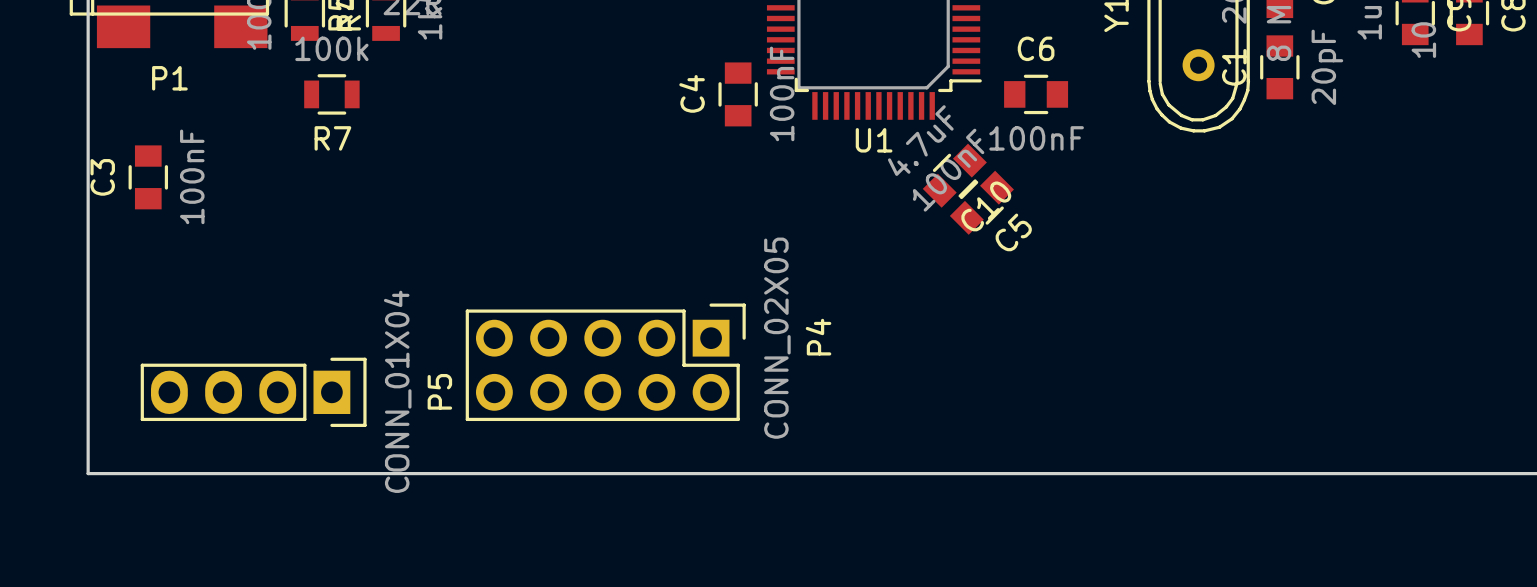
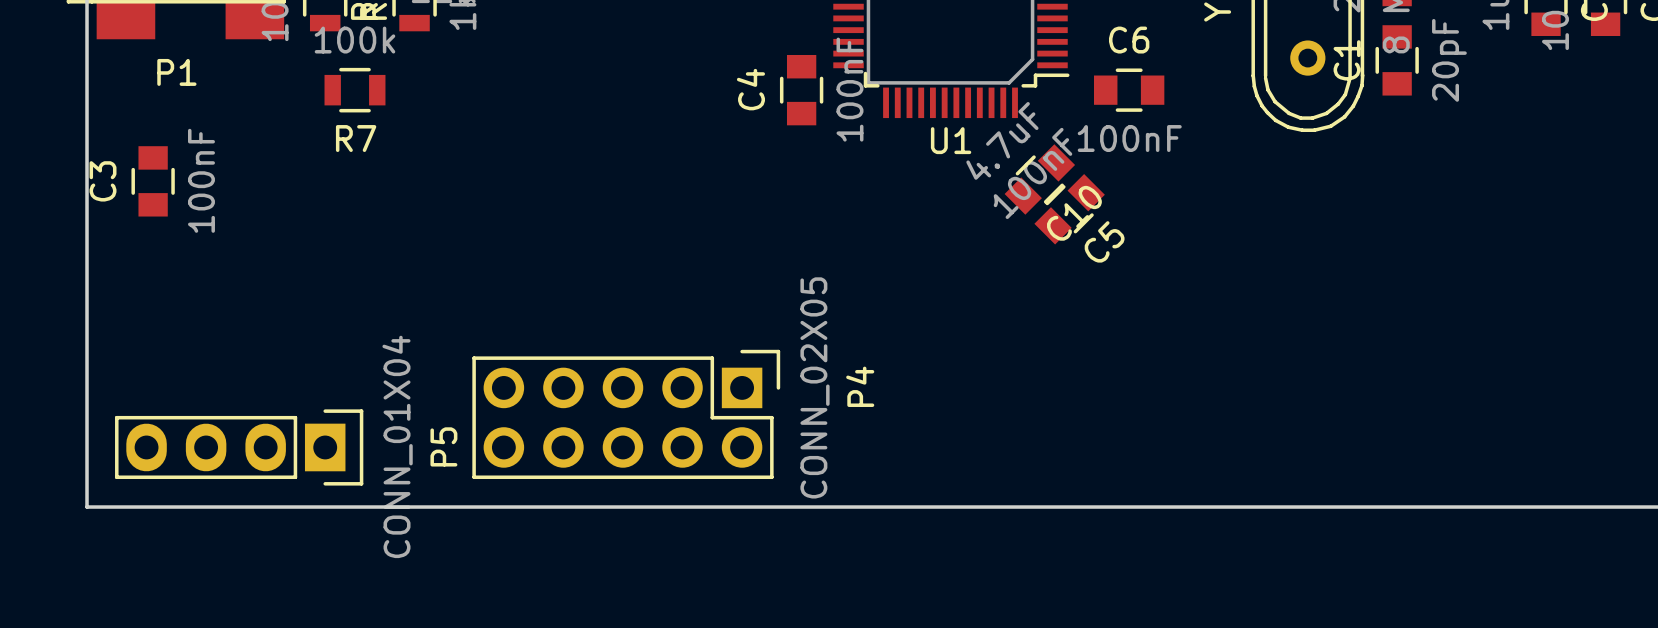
P4 position: (605, 362) -> (626, 414)
P5 position: (253, 392) -> (239, 447)

